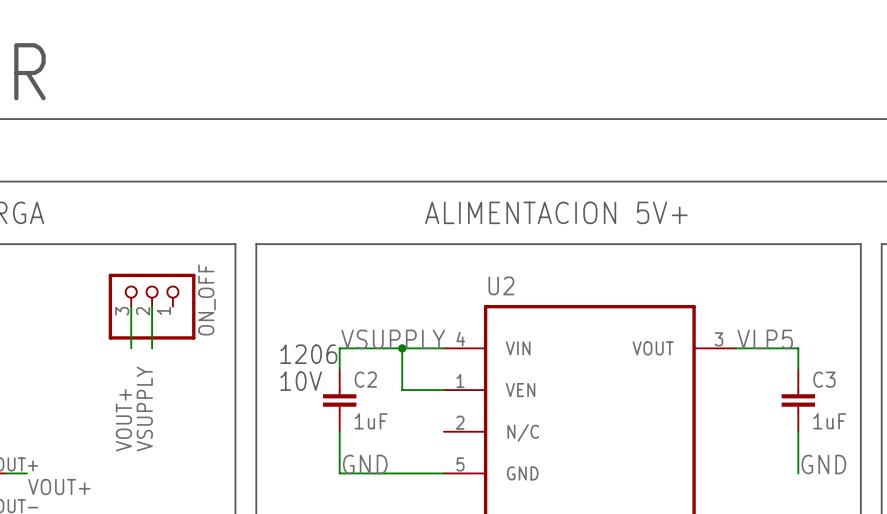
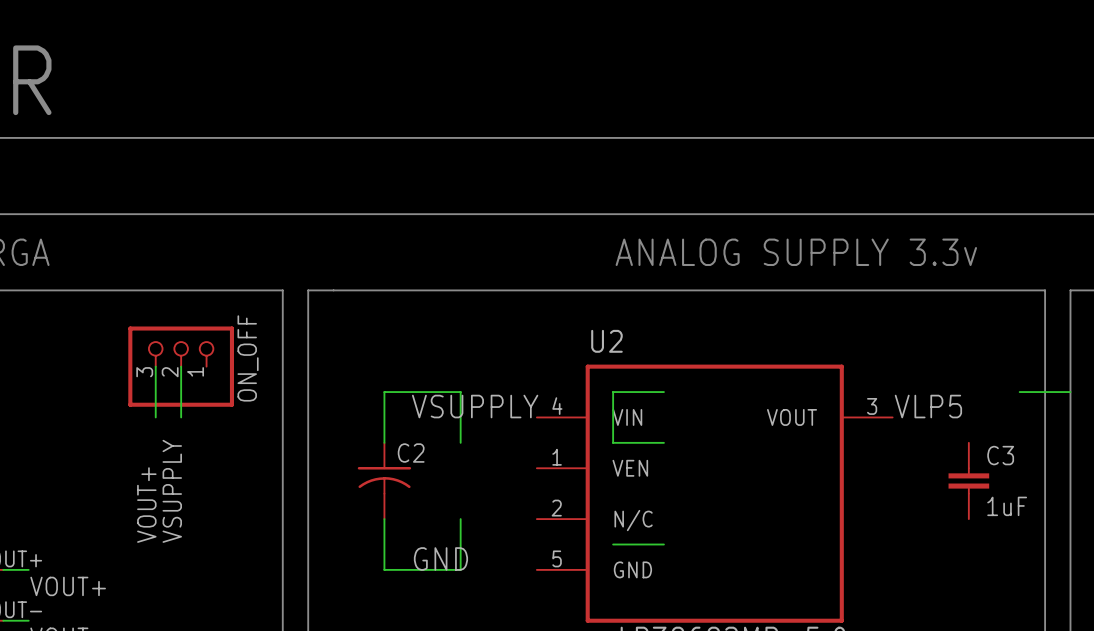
text: ALIMENTACION 5V+ (556, 212) -> none
text: none -> ANALOG SUPPLY 3.3v (796, 252)
wire: none -> (663, 392) (613, 392) (613, 442) (663, 442)
wire: none -> (1019, 392) (1070, 392)
wire: (402, 348) (402, 390) (443, 390) -> none
junction: (402, 348) -> none
wire: (443, 348) (339, 348) (339, 369) -> none
wire: (735, 348) (798, 348) (798, 369) -> none
text: 1206 (308, 354) -> none
wire: none -> (384, 442) (384, 392) (460, 392) (460, 442)
C2 symbol: [323, 369, 357, 432] -> [357, 442, 412, 520]
text: 10V (301, 381) -> none
C2 value: 1uF (371, 421) -> none
wire: (339, 431) (339, 473) -> (384, 519) (384, 569) (409, 569)
wire: (798, 431) (798, 473) -> none
wire: none -> (613, 544) (663, 544)
label: GND (823, 464) -> none
wire: (381, 473) (443, 473) -> (460, 569) (460, 519)

